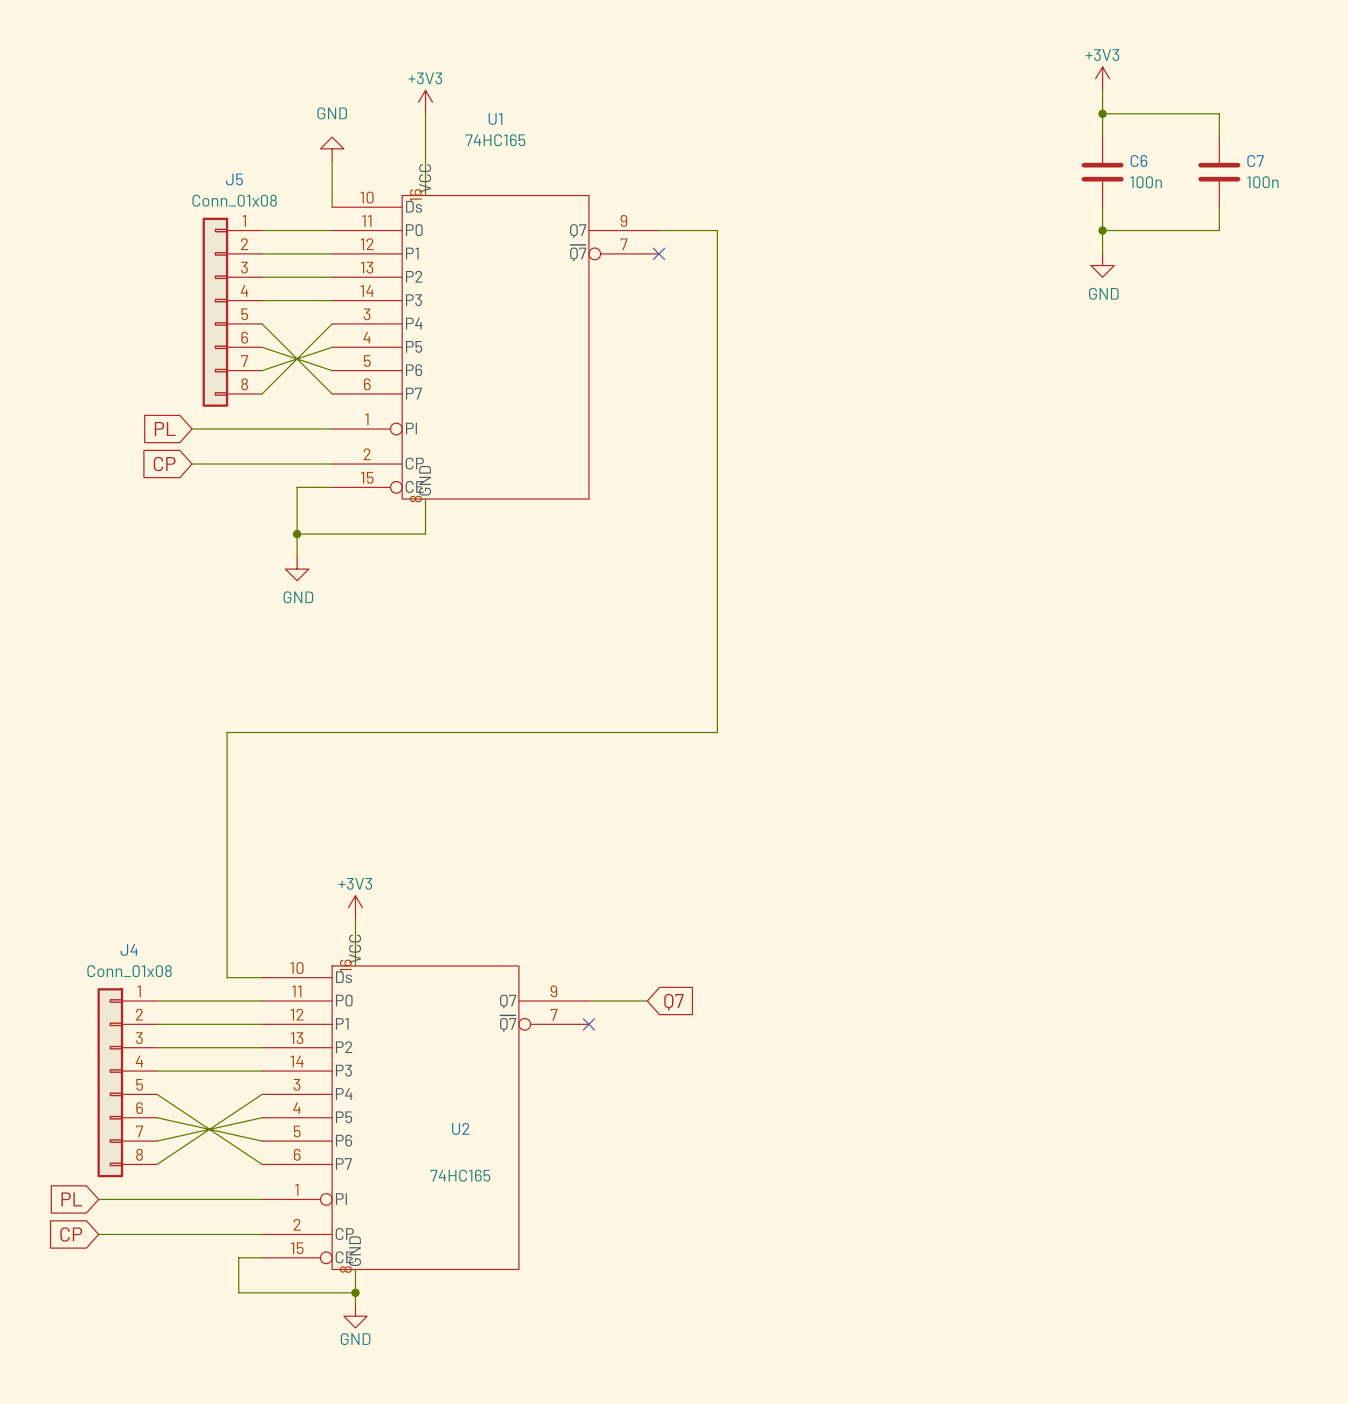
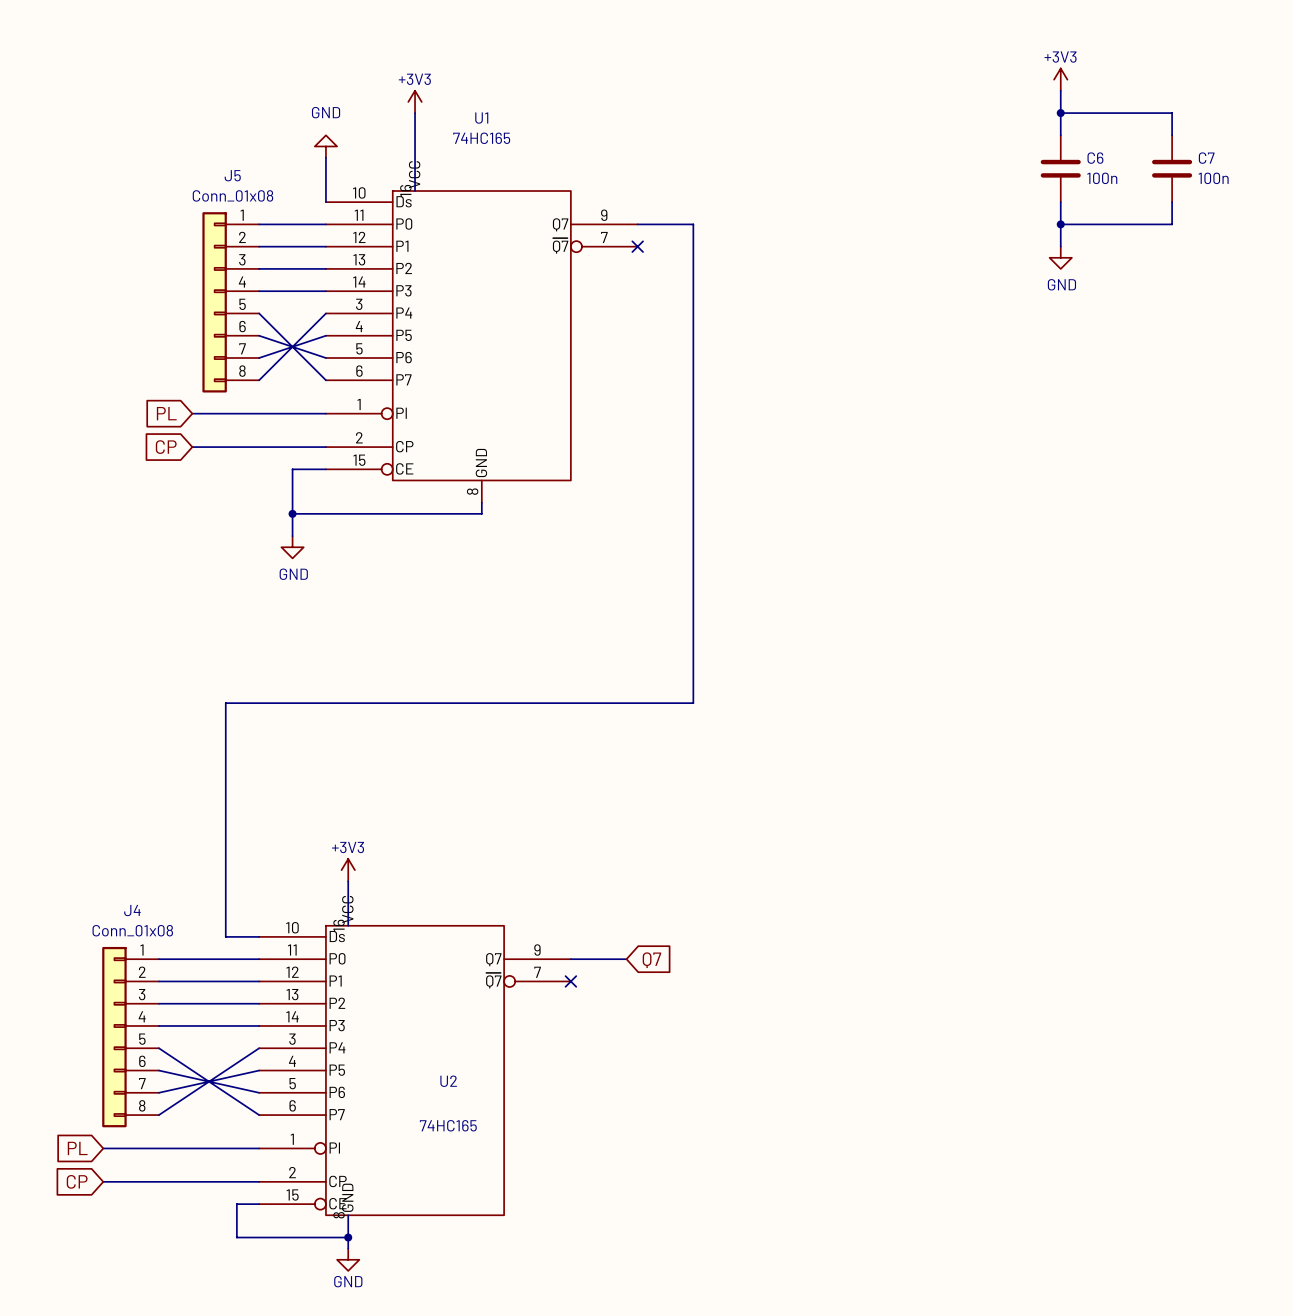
U1 symbol: [332, 195, 659, 500] -> [325, 191, 638, 503]
wire: (425, 499) (425, 534) -> (481, 502) (481, 513) (415, 513)

